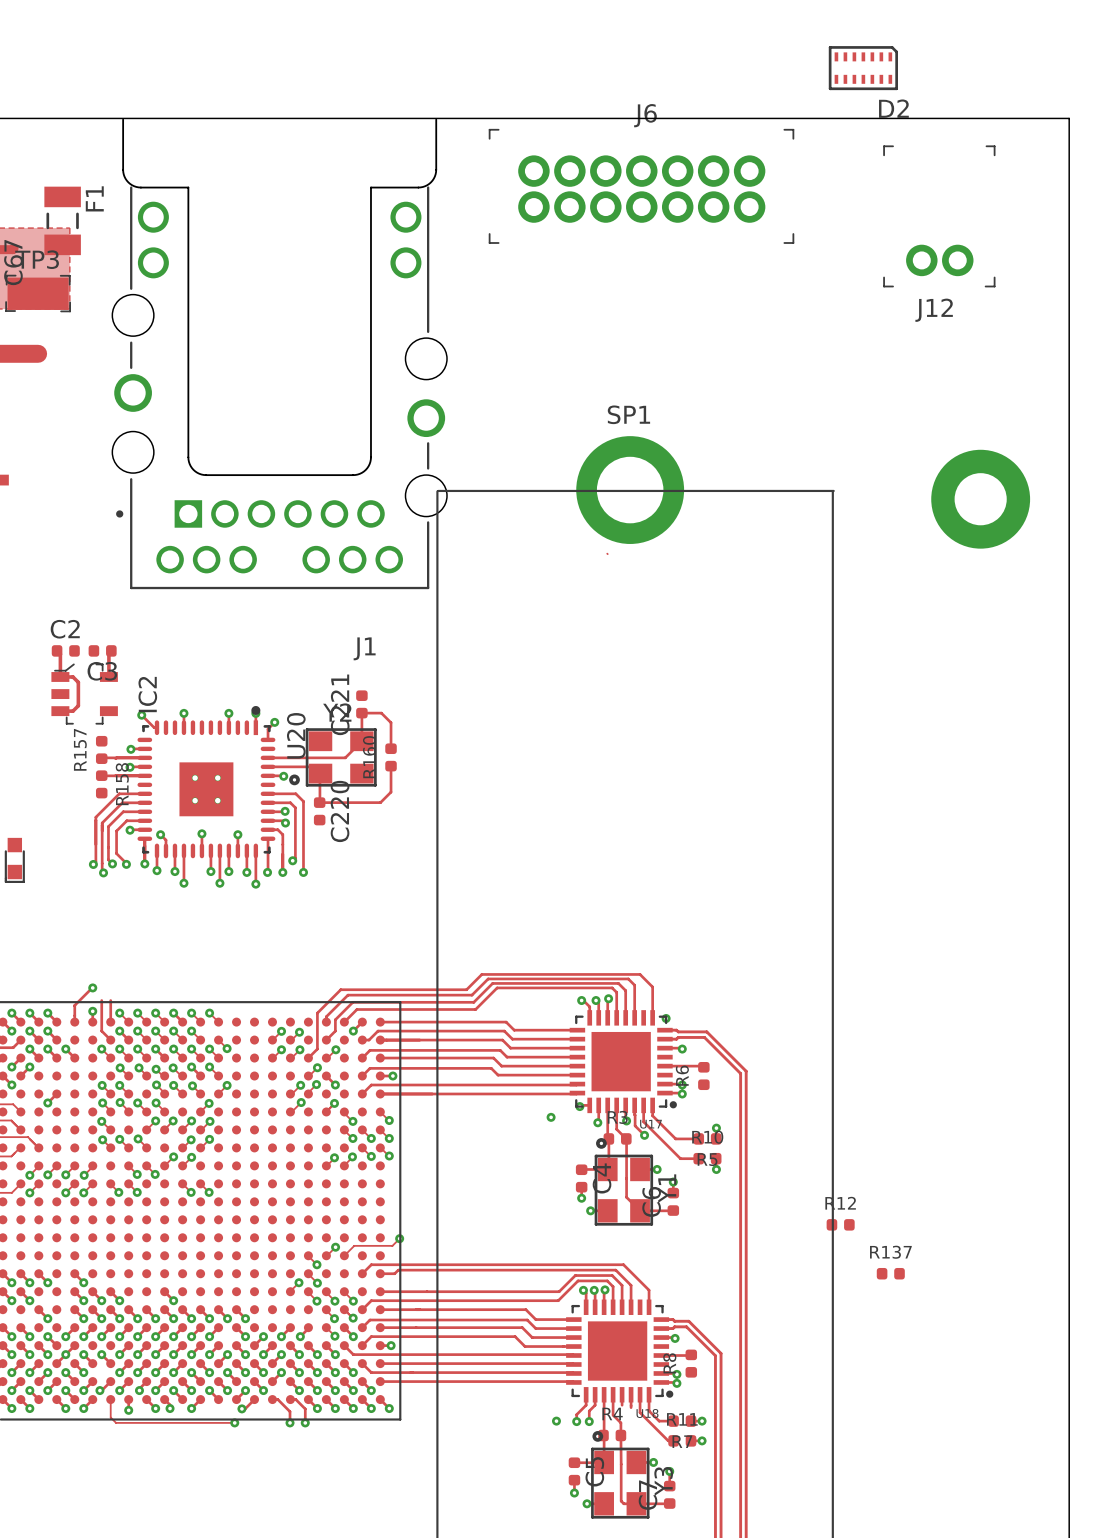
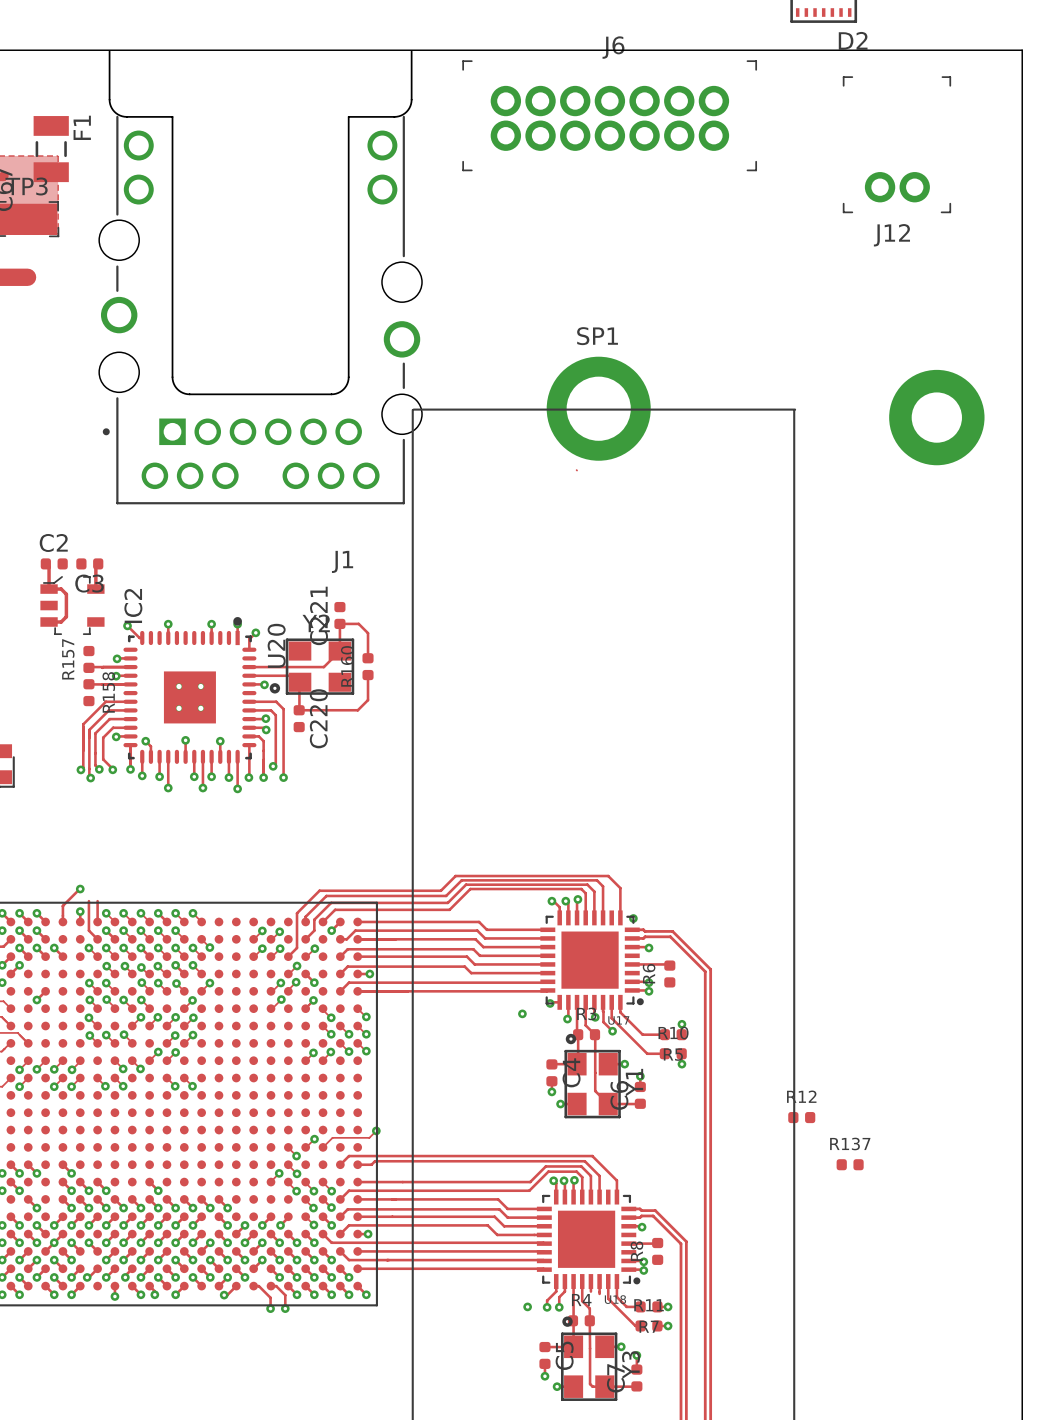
track: (110, 1399) (110, 1417) (116, 1422) (234, 1422) -> none
via: (234, 1422) -> none

